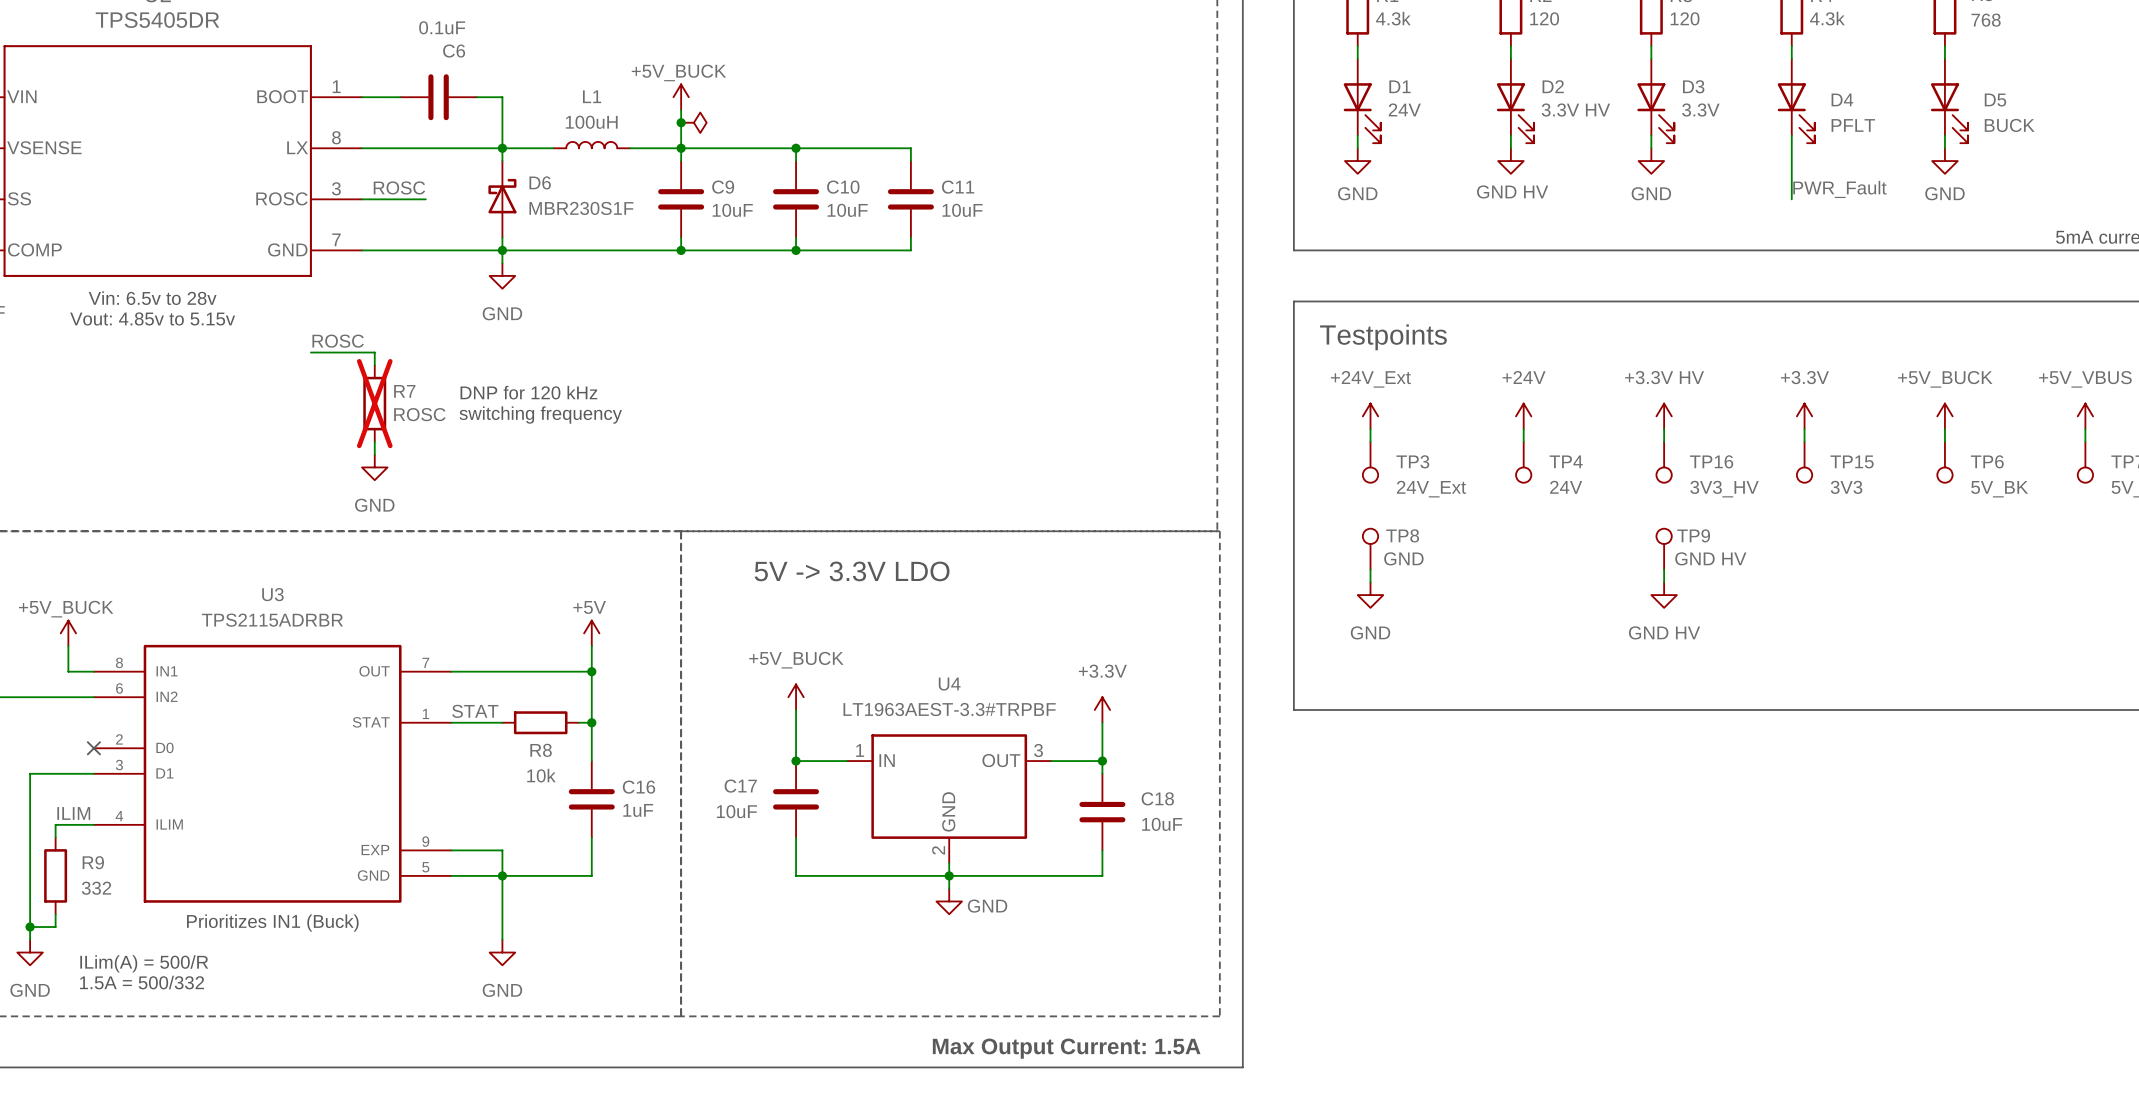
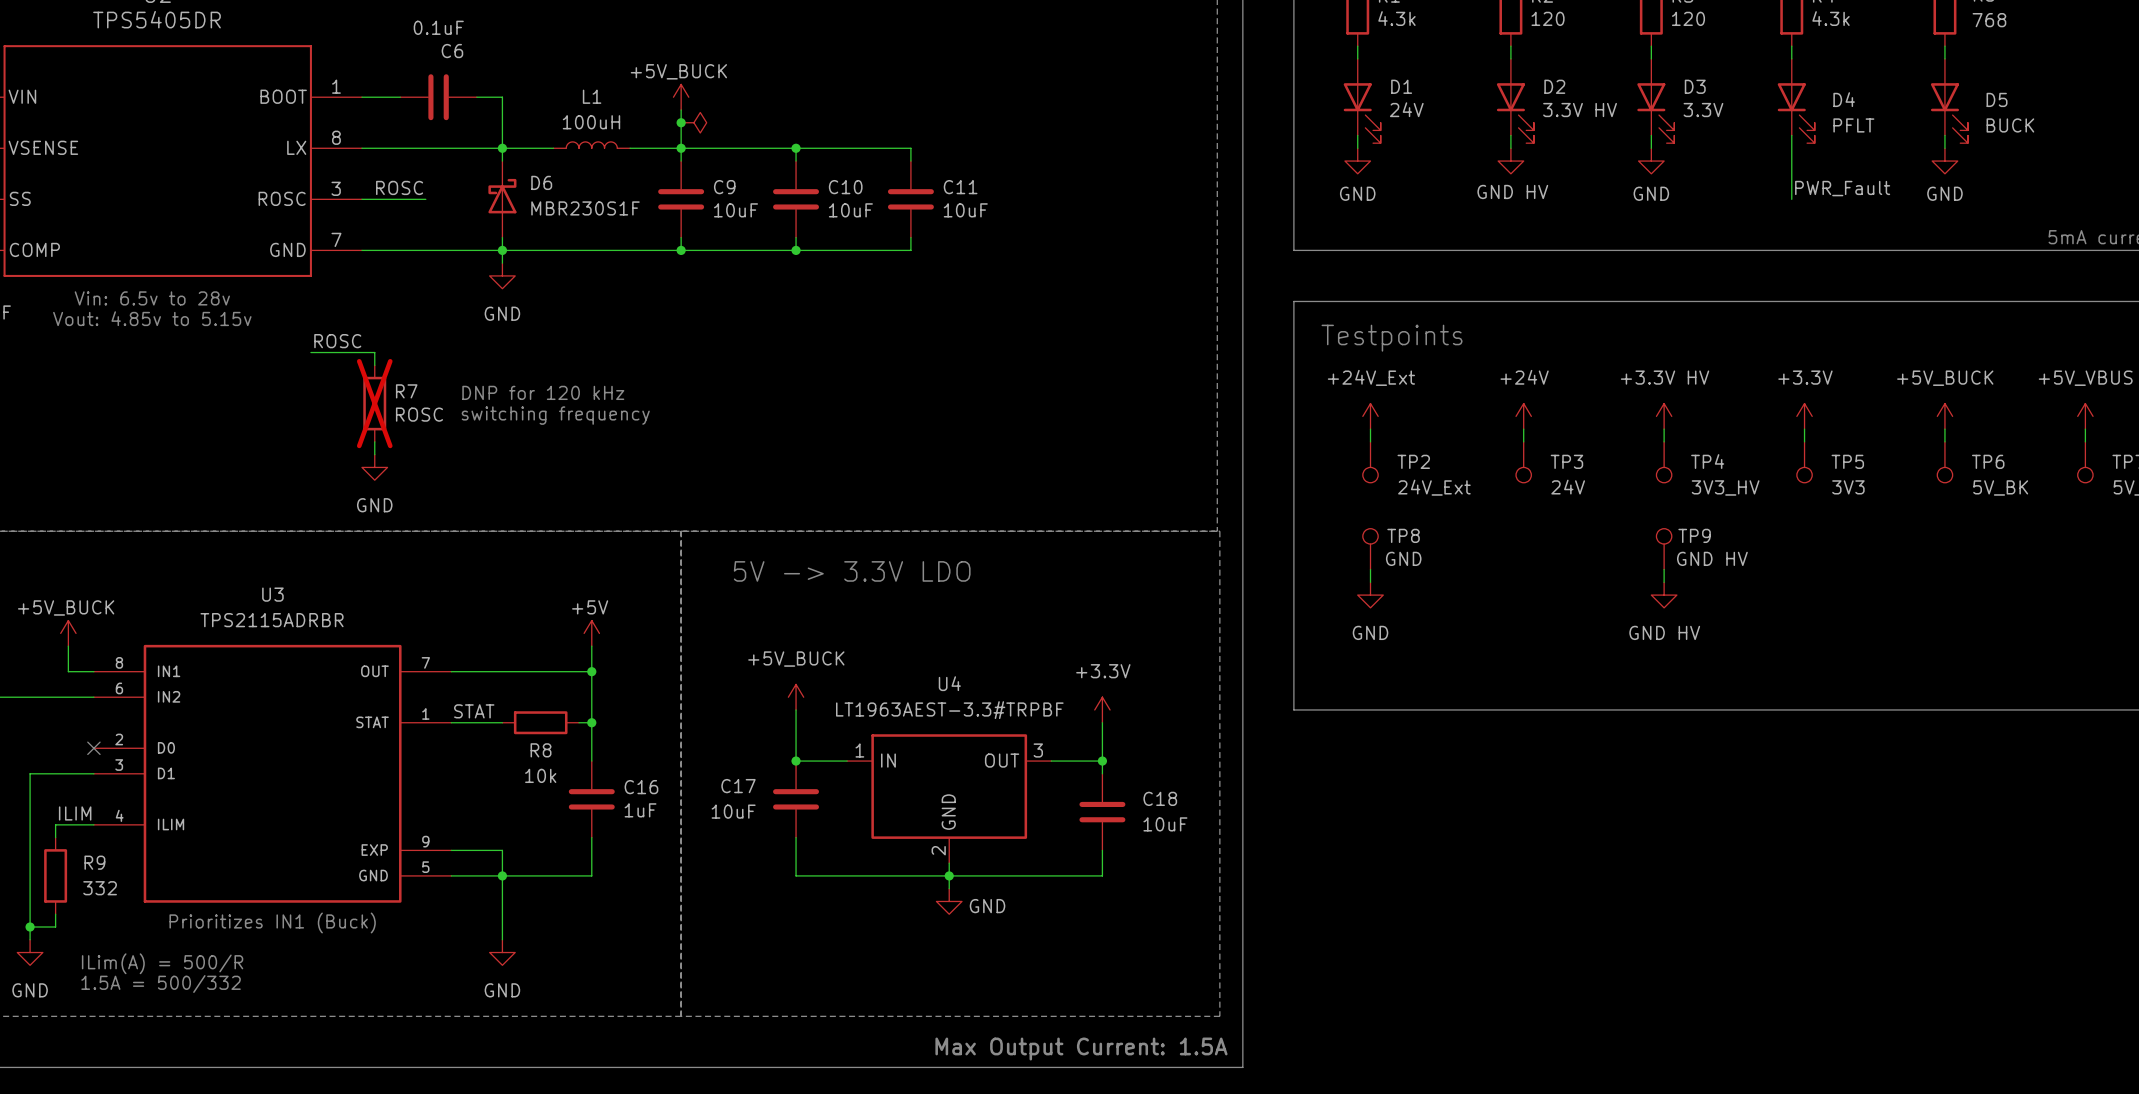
TP3 name: TP3 (1412, 461) -> TP2 (1413, 461)
TP4 name: TP4 (1566, 461) -> TP3 (1566, 461)
TP16 name: TP16 (1711, 461) -> TP4 (1707, 461)
TP15 name: TP15 (1852, 461) -> TP5 (1847, 461)

